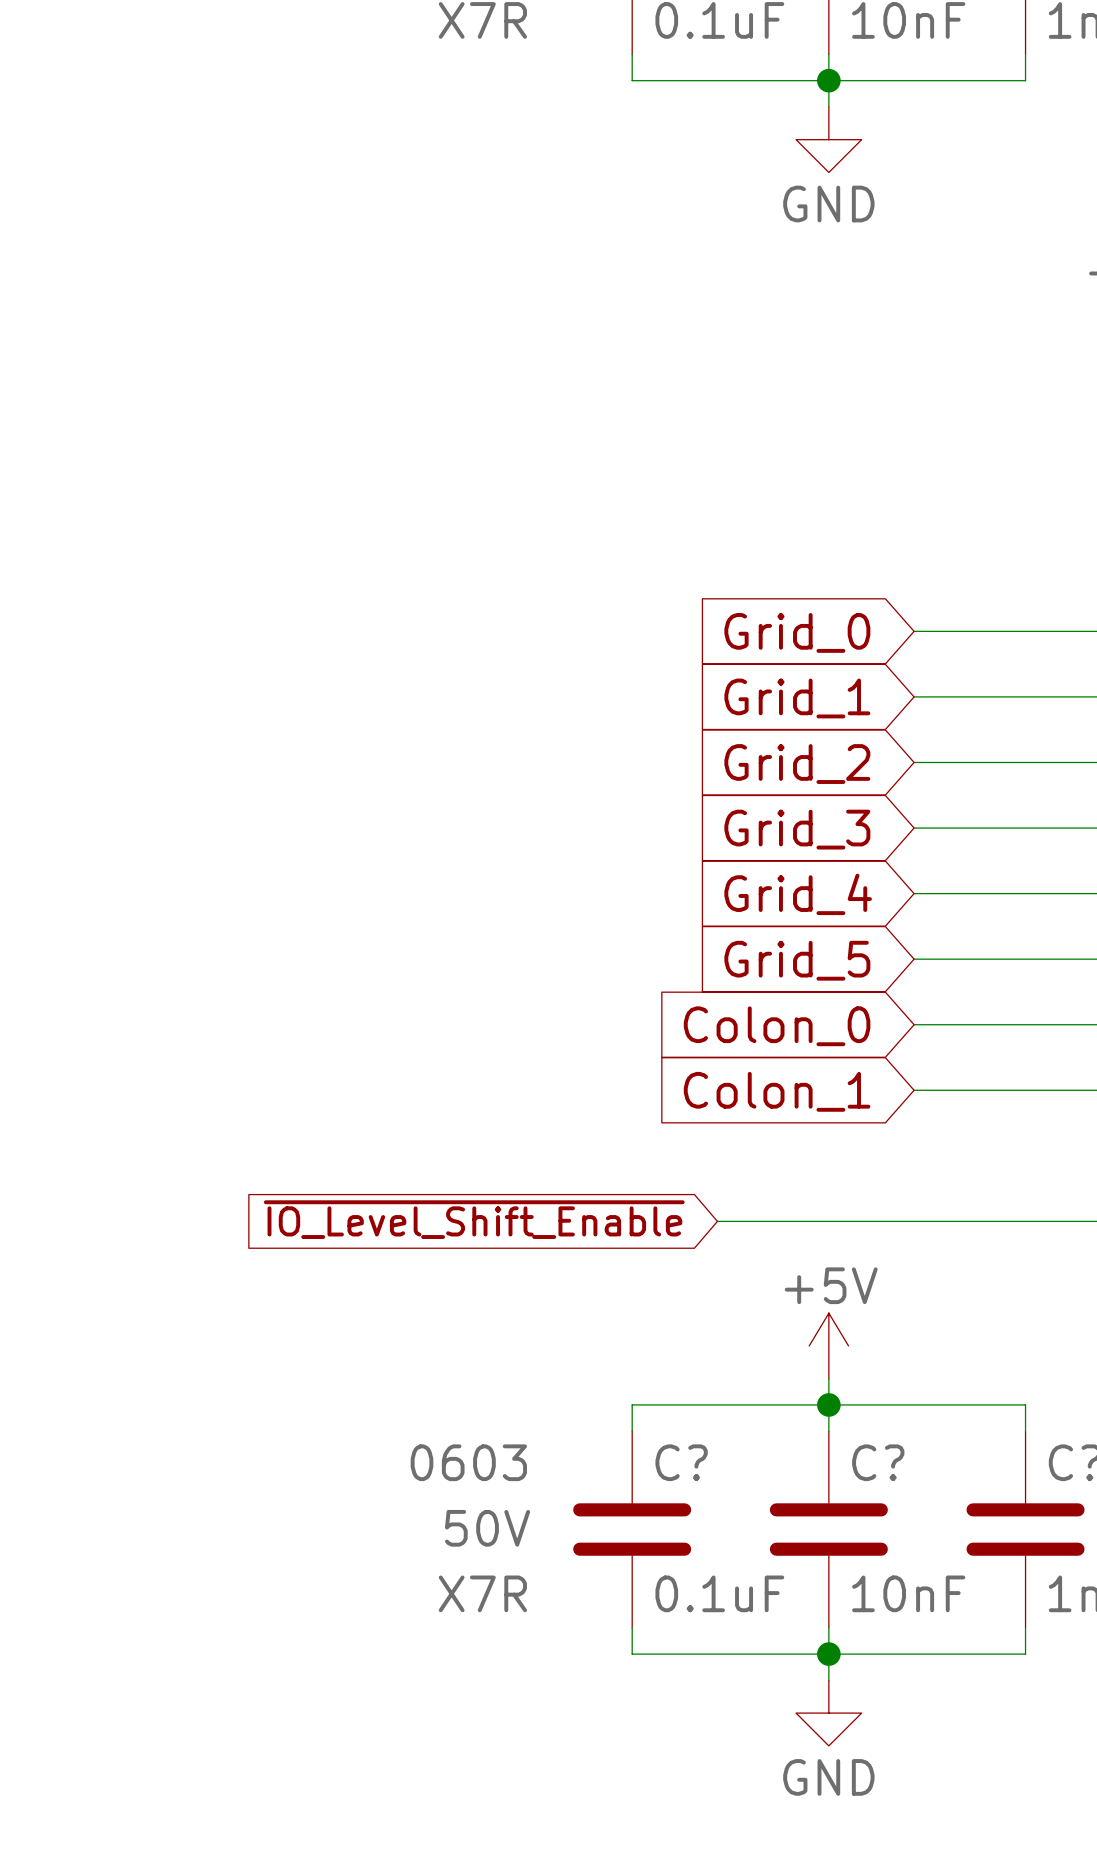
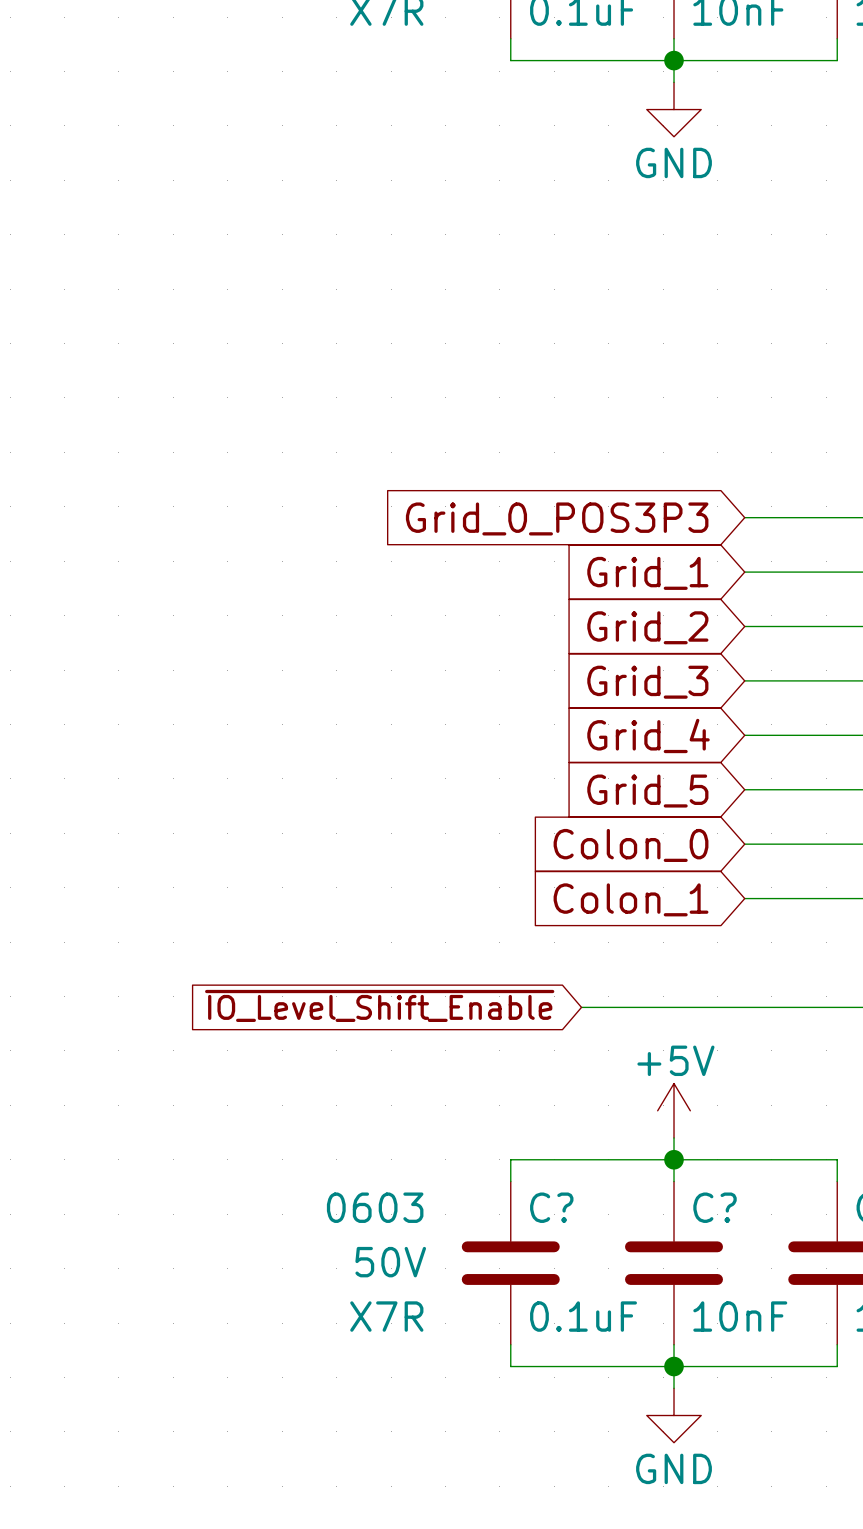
global label: Grid_0 (797, 632) -> Grid_0_POS3P3 (557, 518)

